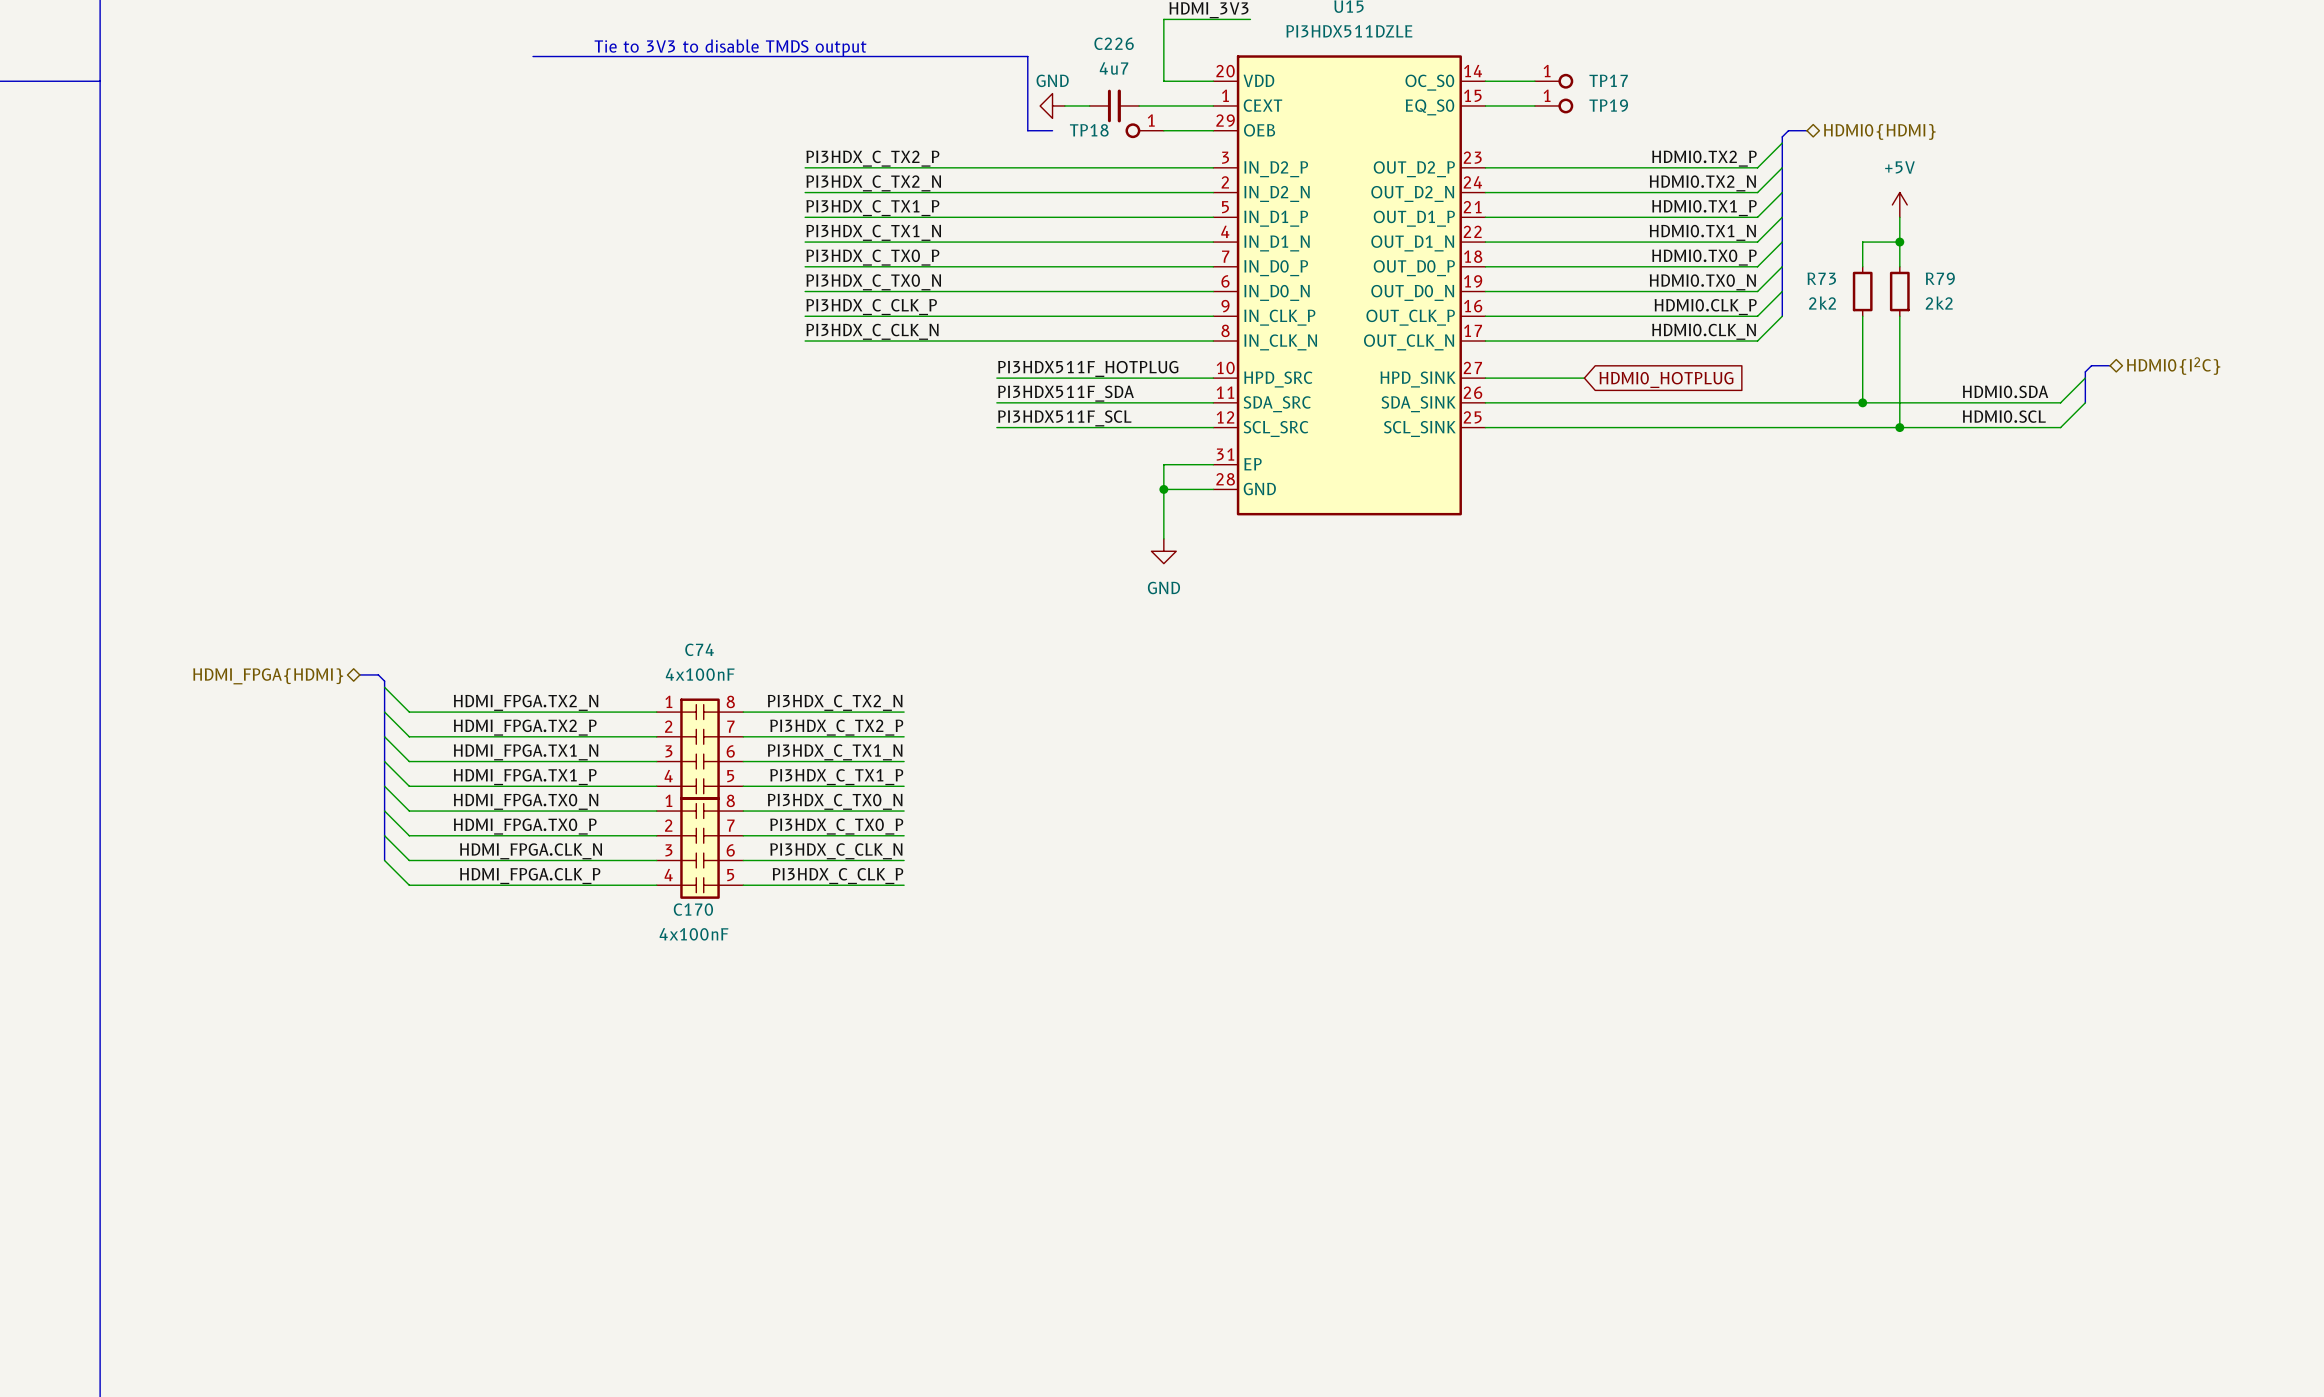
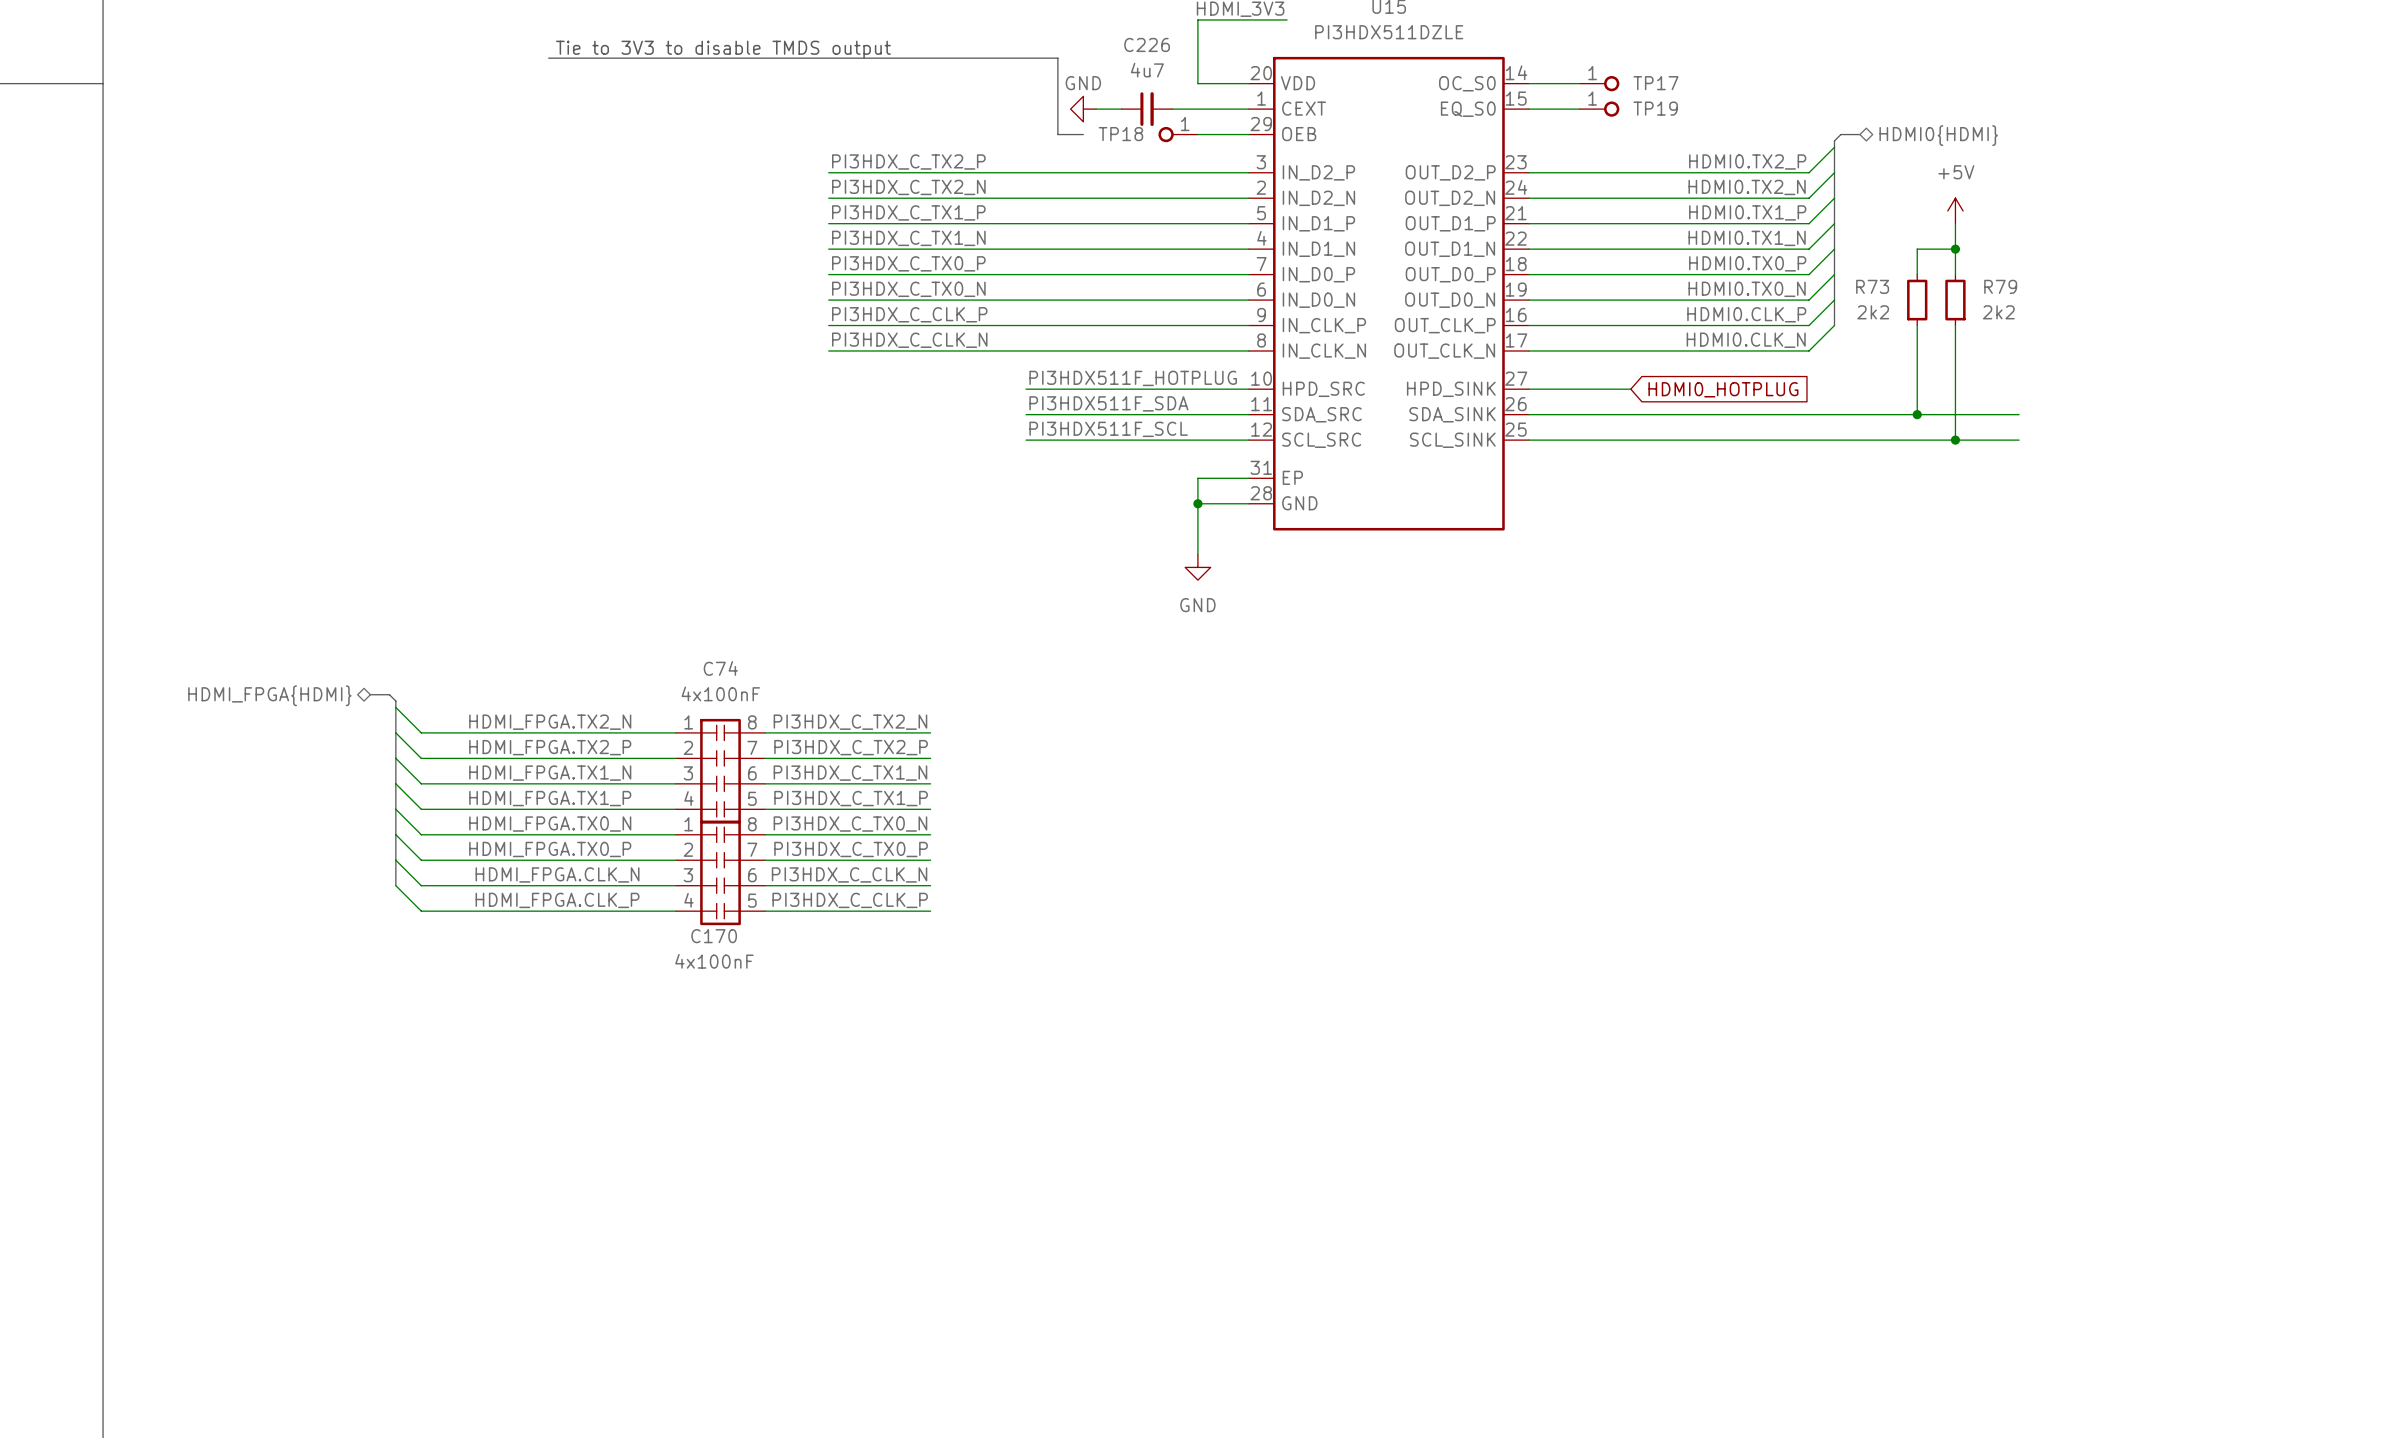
bus: (2110, 365) (2091, 365) (2085, 371) (2085, 402) -> none
hierarchical label: HDMI0{I2C} (2173, 366) -> none
wire: (2085, 378) (2060, 402) (1961, 402) -> none
label: HDMI0.SDA (2005, 391) -> none
wire: (2085, 402) (2060, 427) (1961, 427) -> none
label: HDMI0.SCL (2004, 416) -> none

